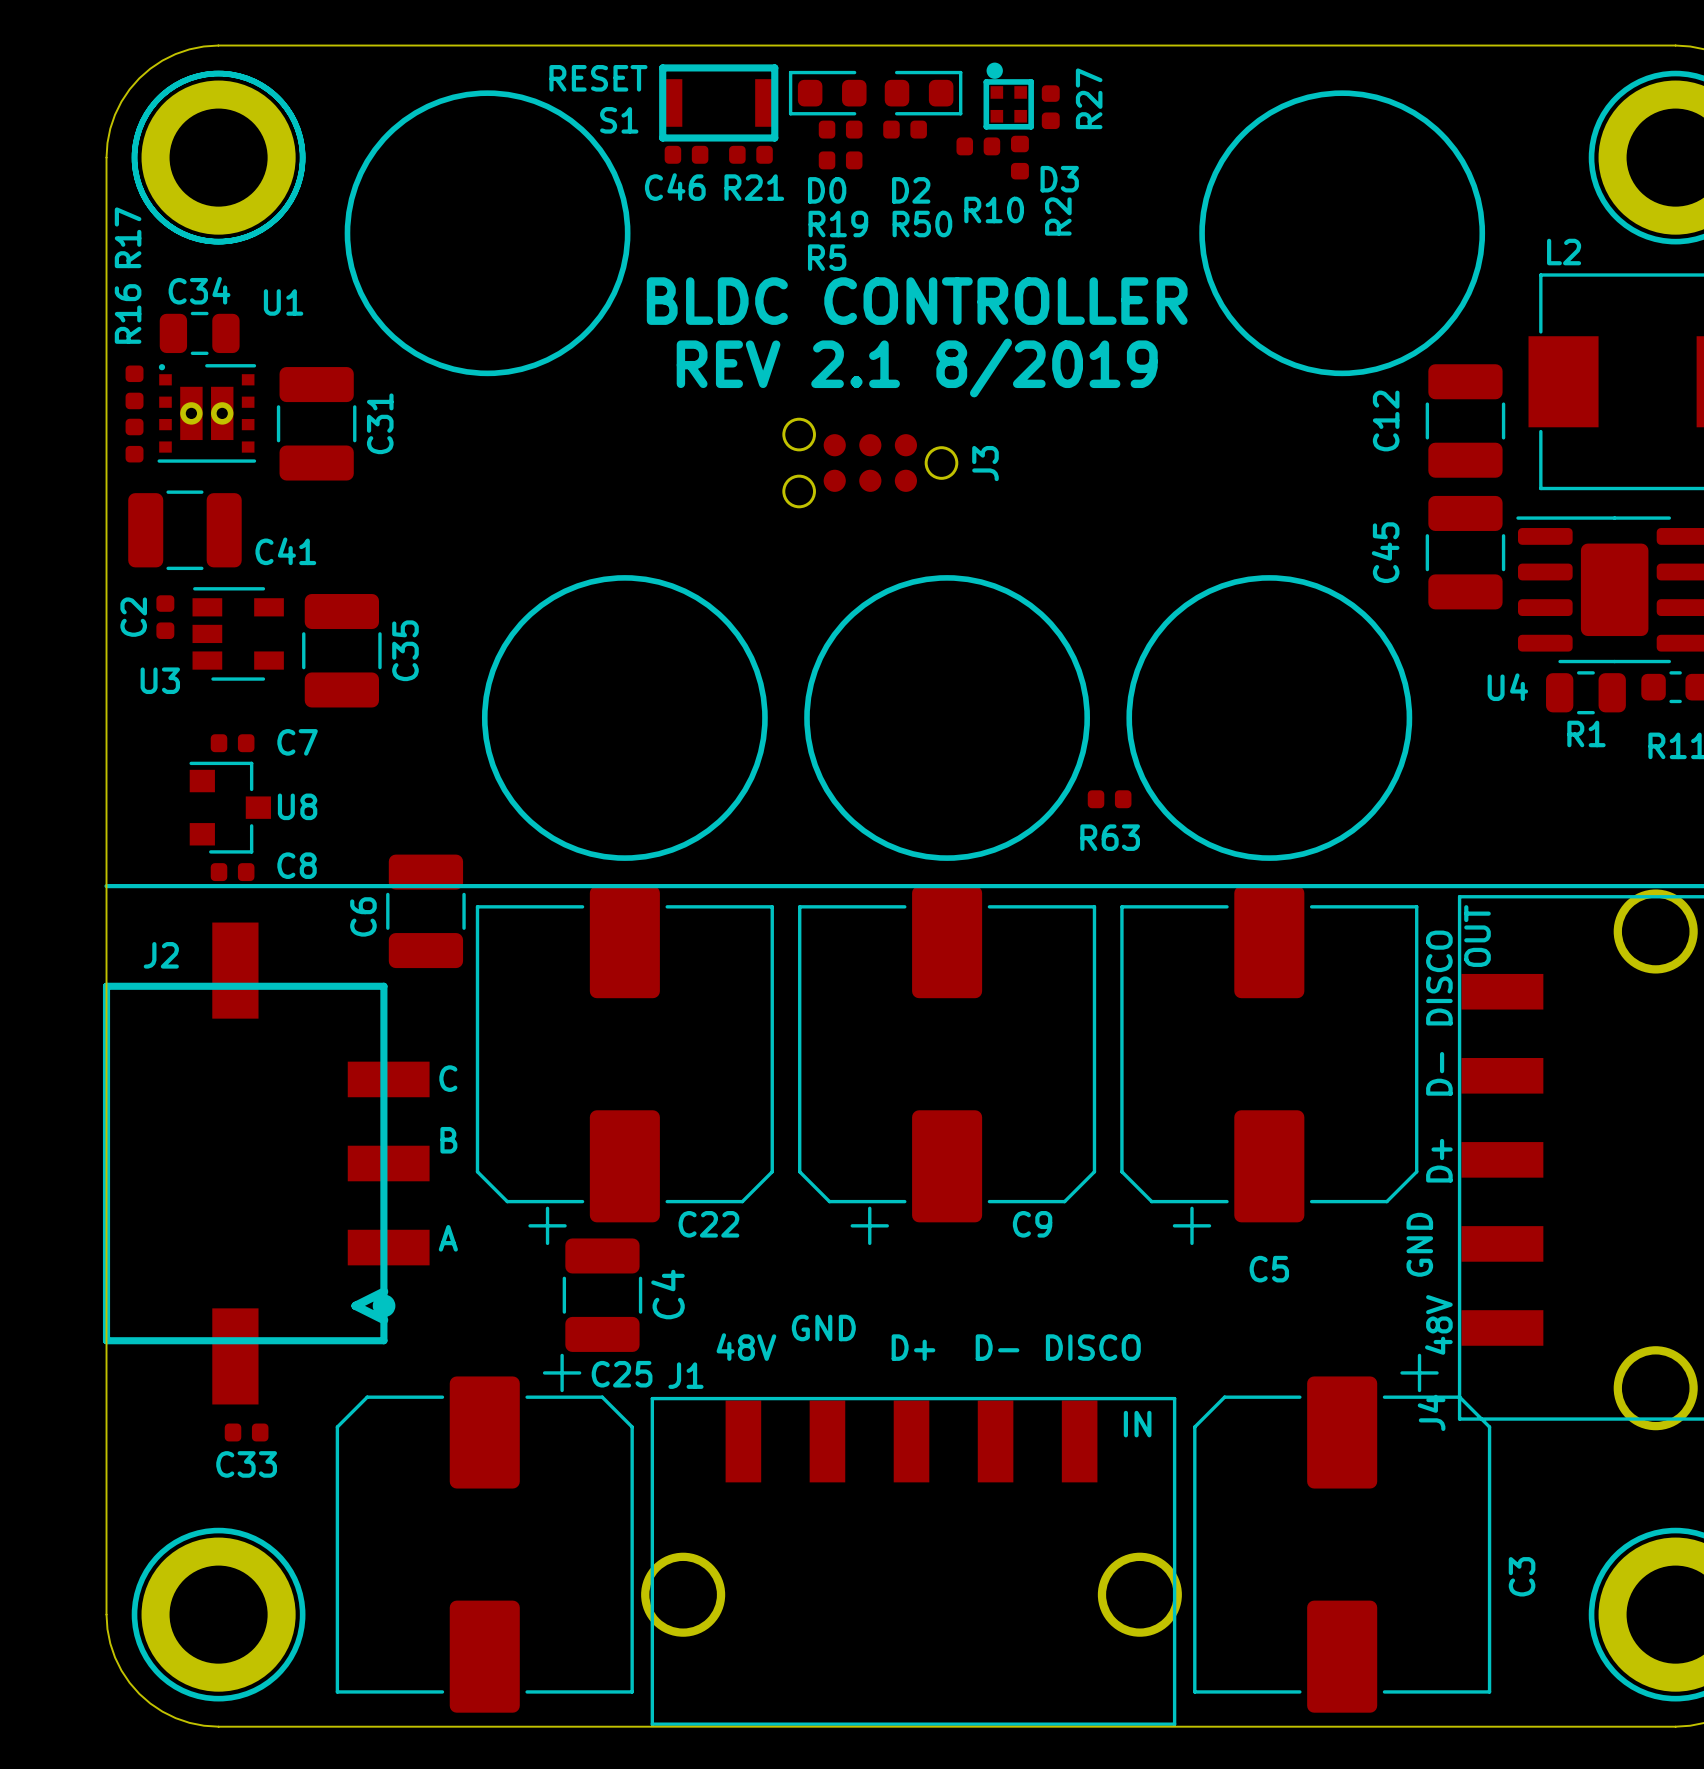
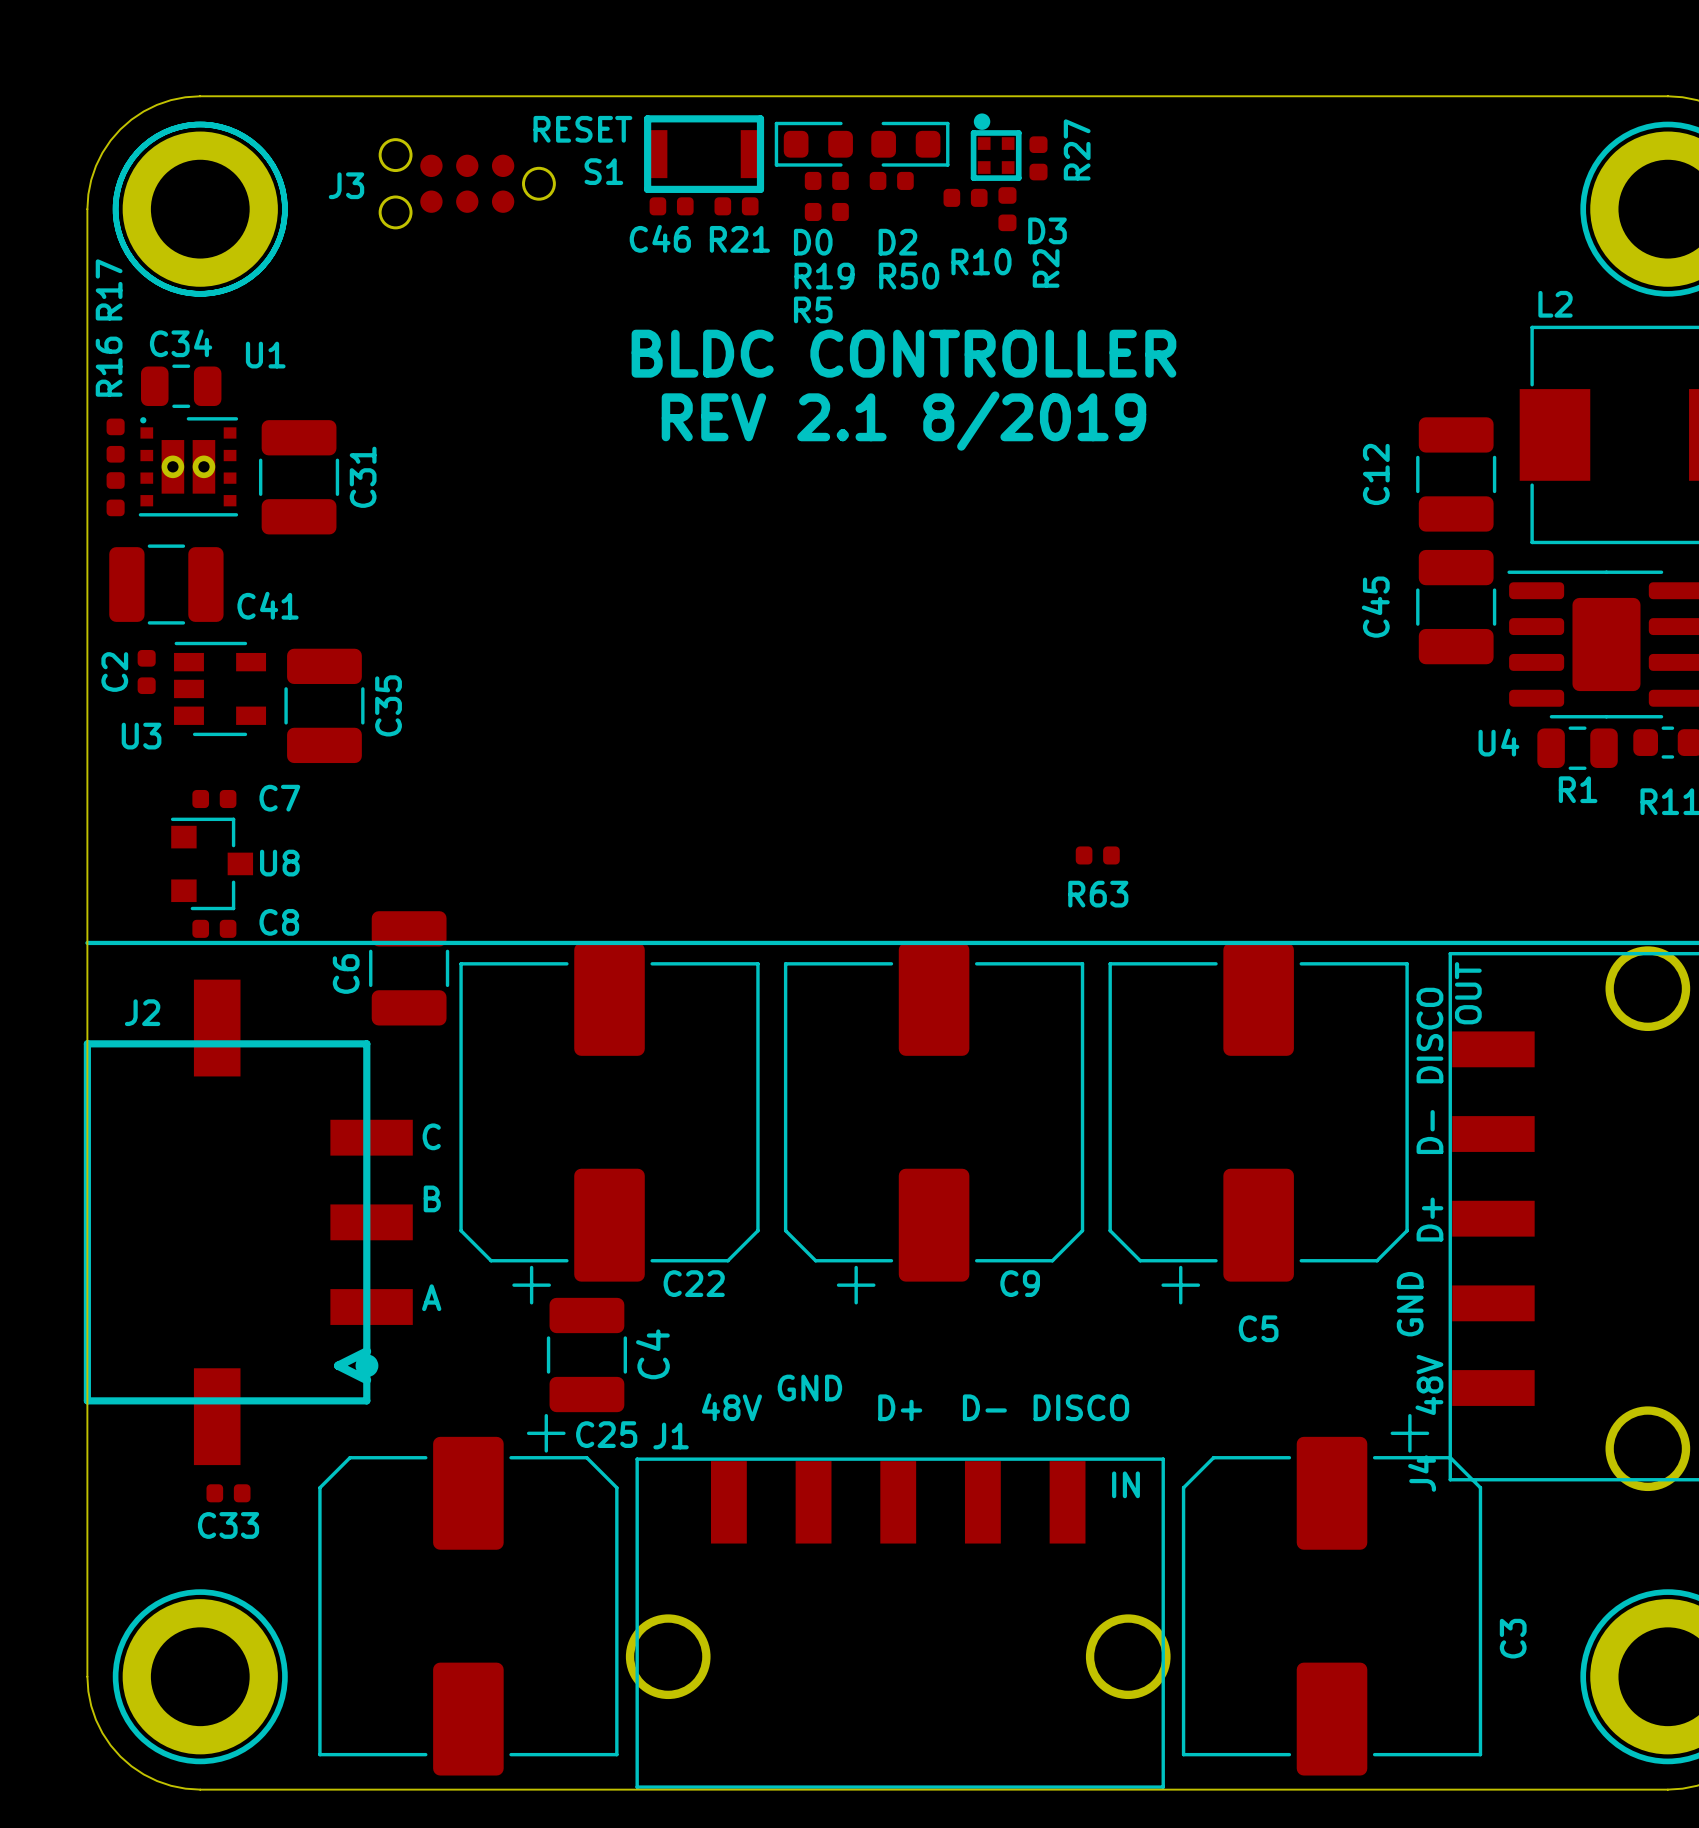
drawing: [344, 90, 631, 377] -> none
drawing: [1199, 90, 1486, 377] -> none
J3 position: (870, 463) -> (467, 183)
J3 name rotation: 0° (985, 463) -> 90° clockwise (346, 185)
J3 name position: J3 (985, 463) -> J3 (346, 185)
drawing: [481, 575, 768, 861] -> none
drawing: [804, 575, 1091, 861] -> none
drawing: [1126, 575, 1413, 861] -> none

